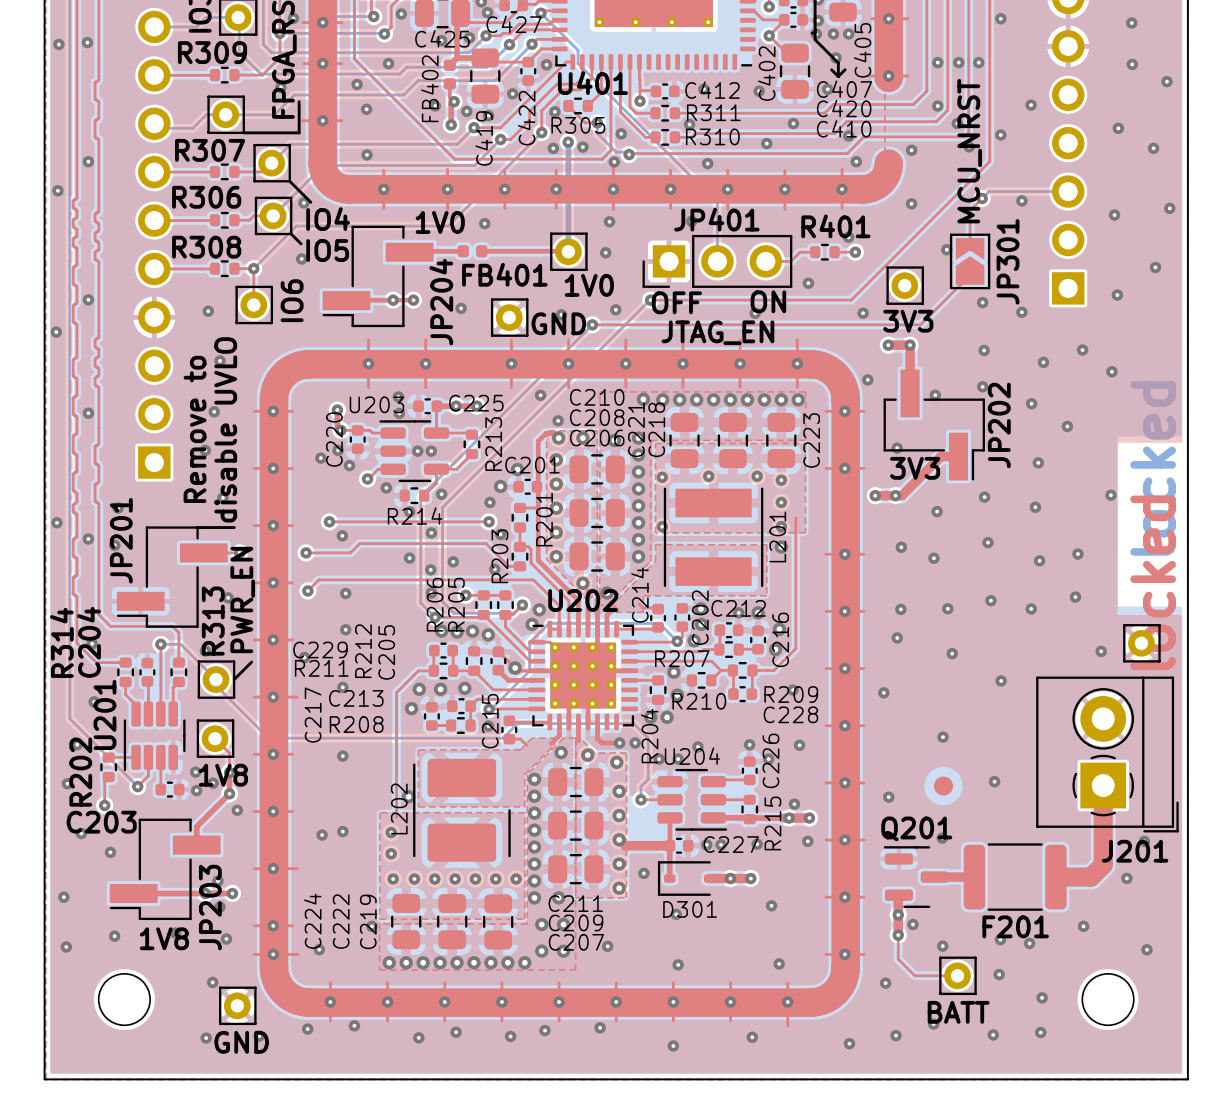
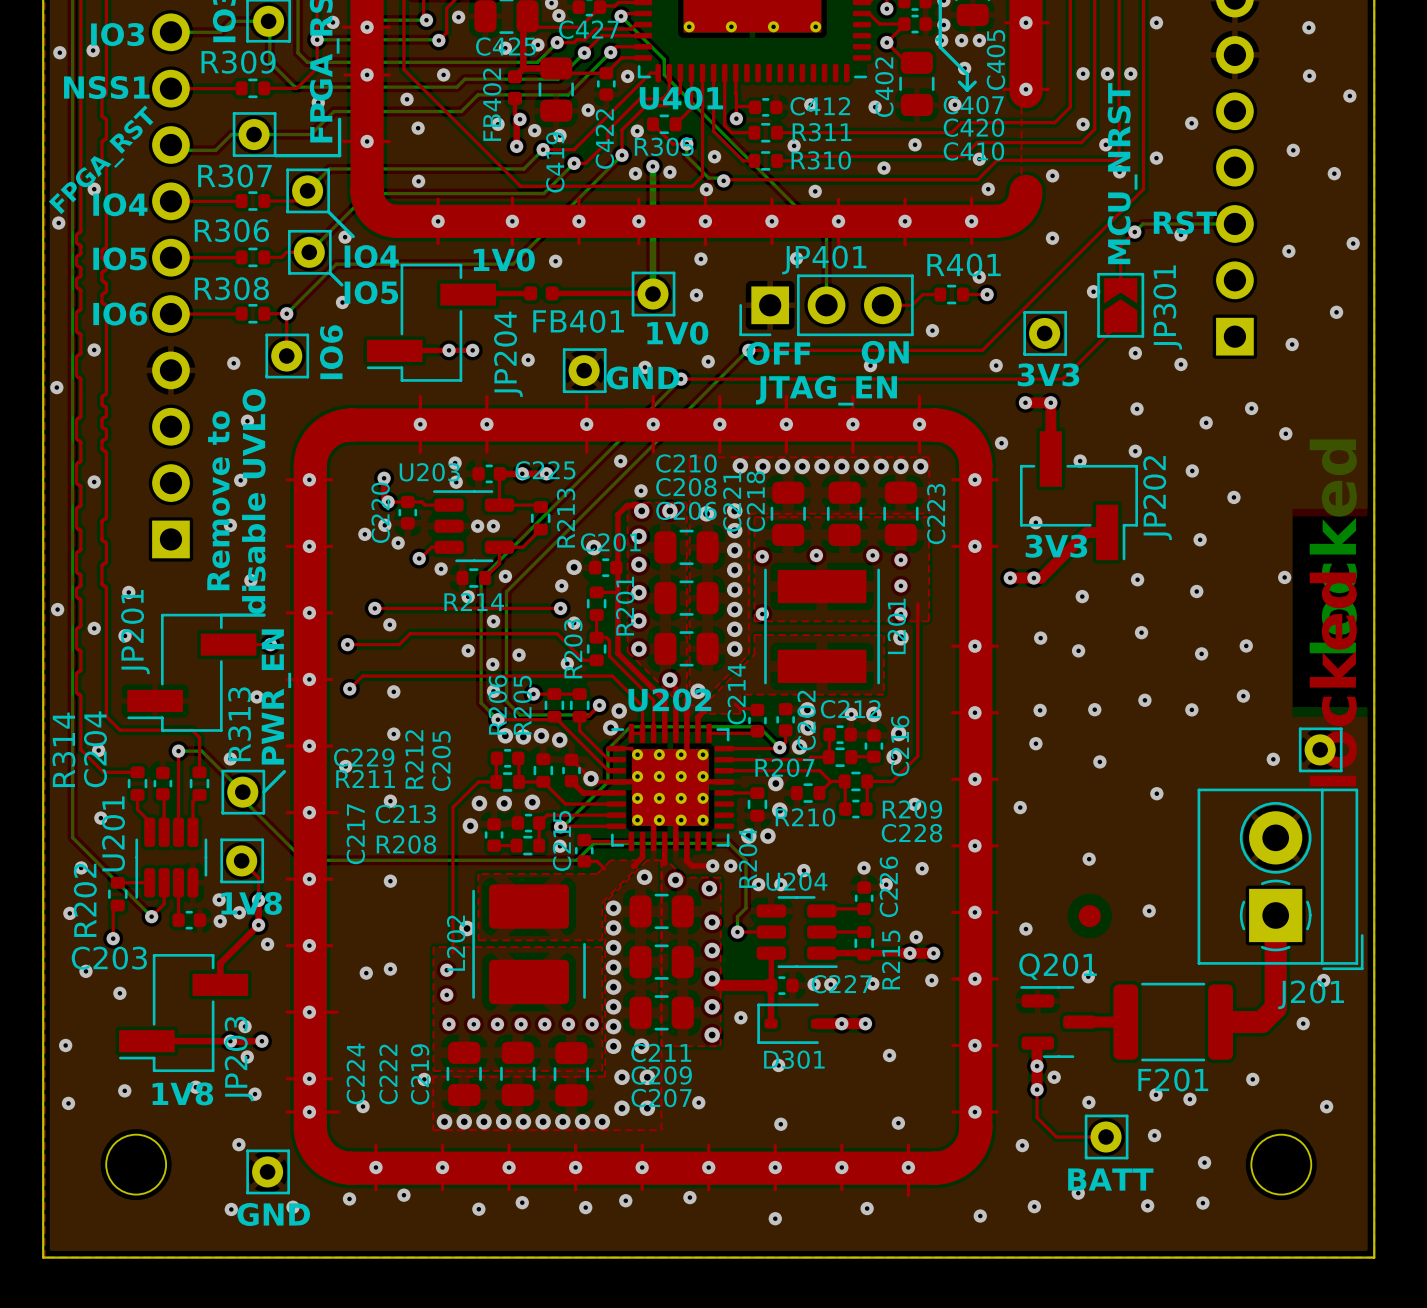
text: none -> IO3 (117, 34)
text: none -> NSS1 (106, 87)
text: none -> FPGA_RST (101, 159)
text: none -> IO4 (120, 204)
text: none -> RST (1185, 222)
text: none -> IO5 (120, 258)
text: none -> IO6 (120, 314)

